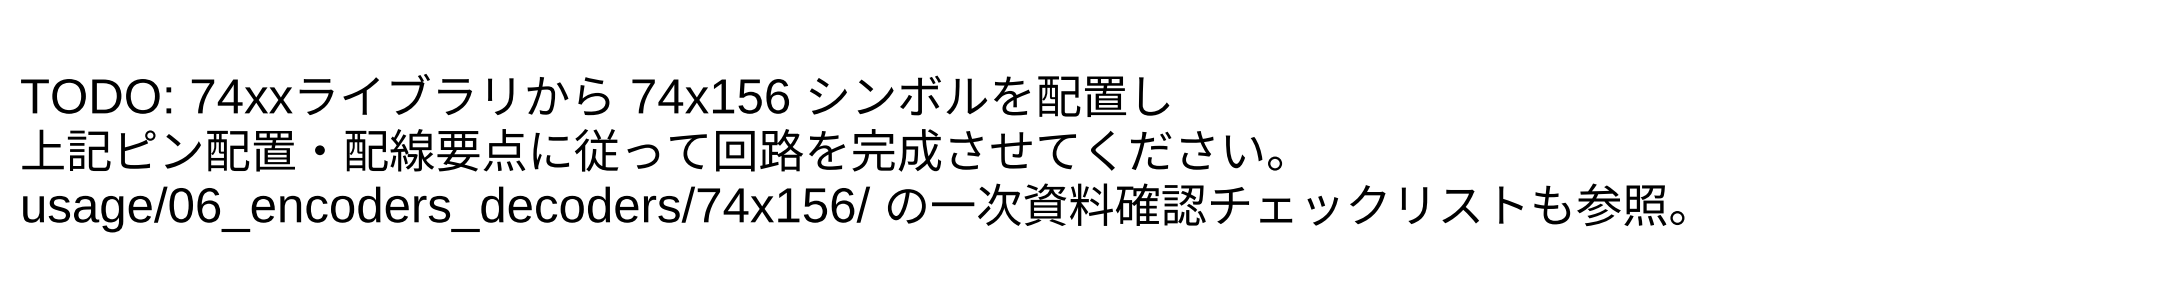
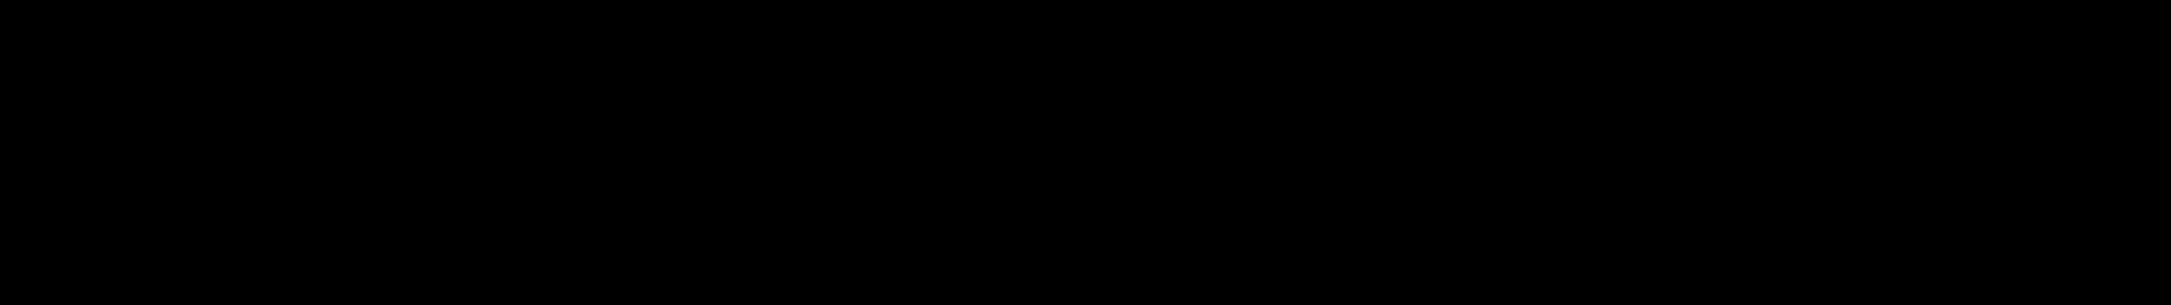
text: TODO: 74xxライブラリから 74x156 シンボルを配置し (595, 95) -> none
text: 上記ピン配置・配線要点に従って回路を完成させてください。 (652, 150) -> none
text: usage/06_encoders_decoders/74x156/ の一次資料確認チェックリストも参照。 (853, 207) -> none

